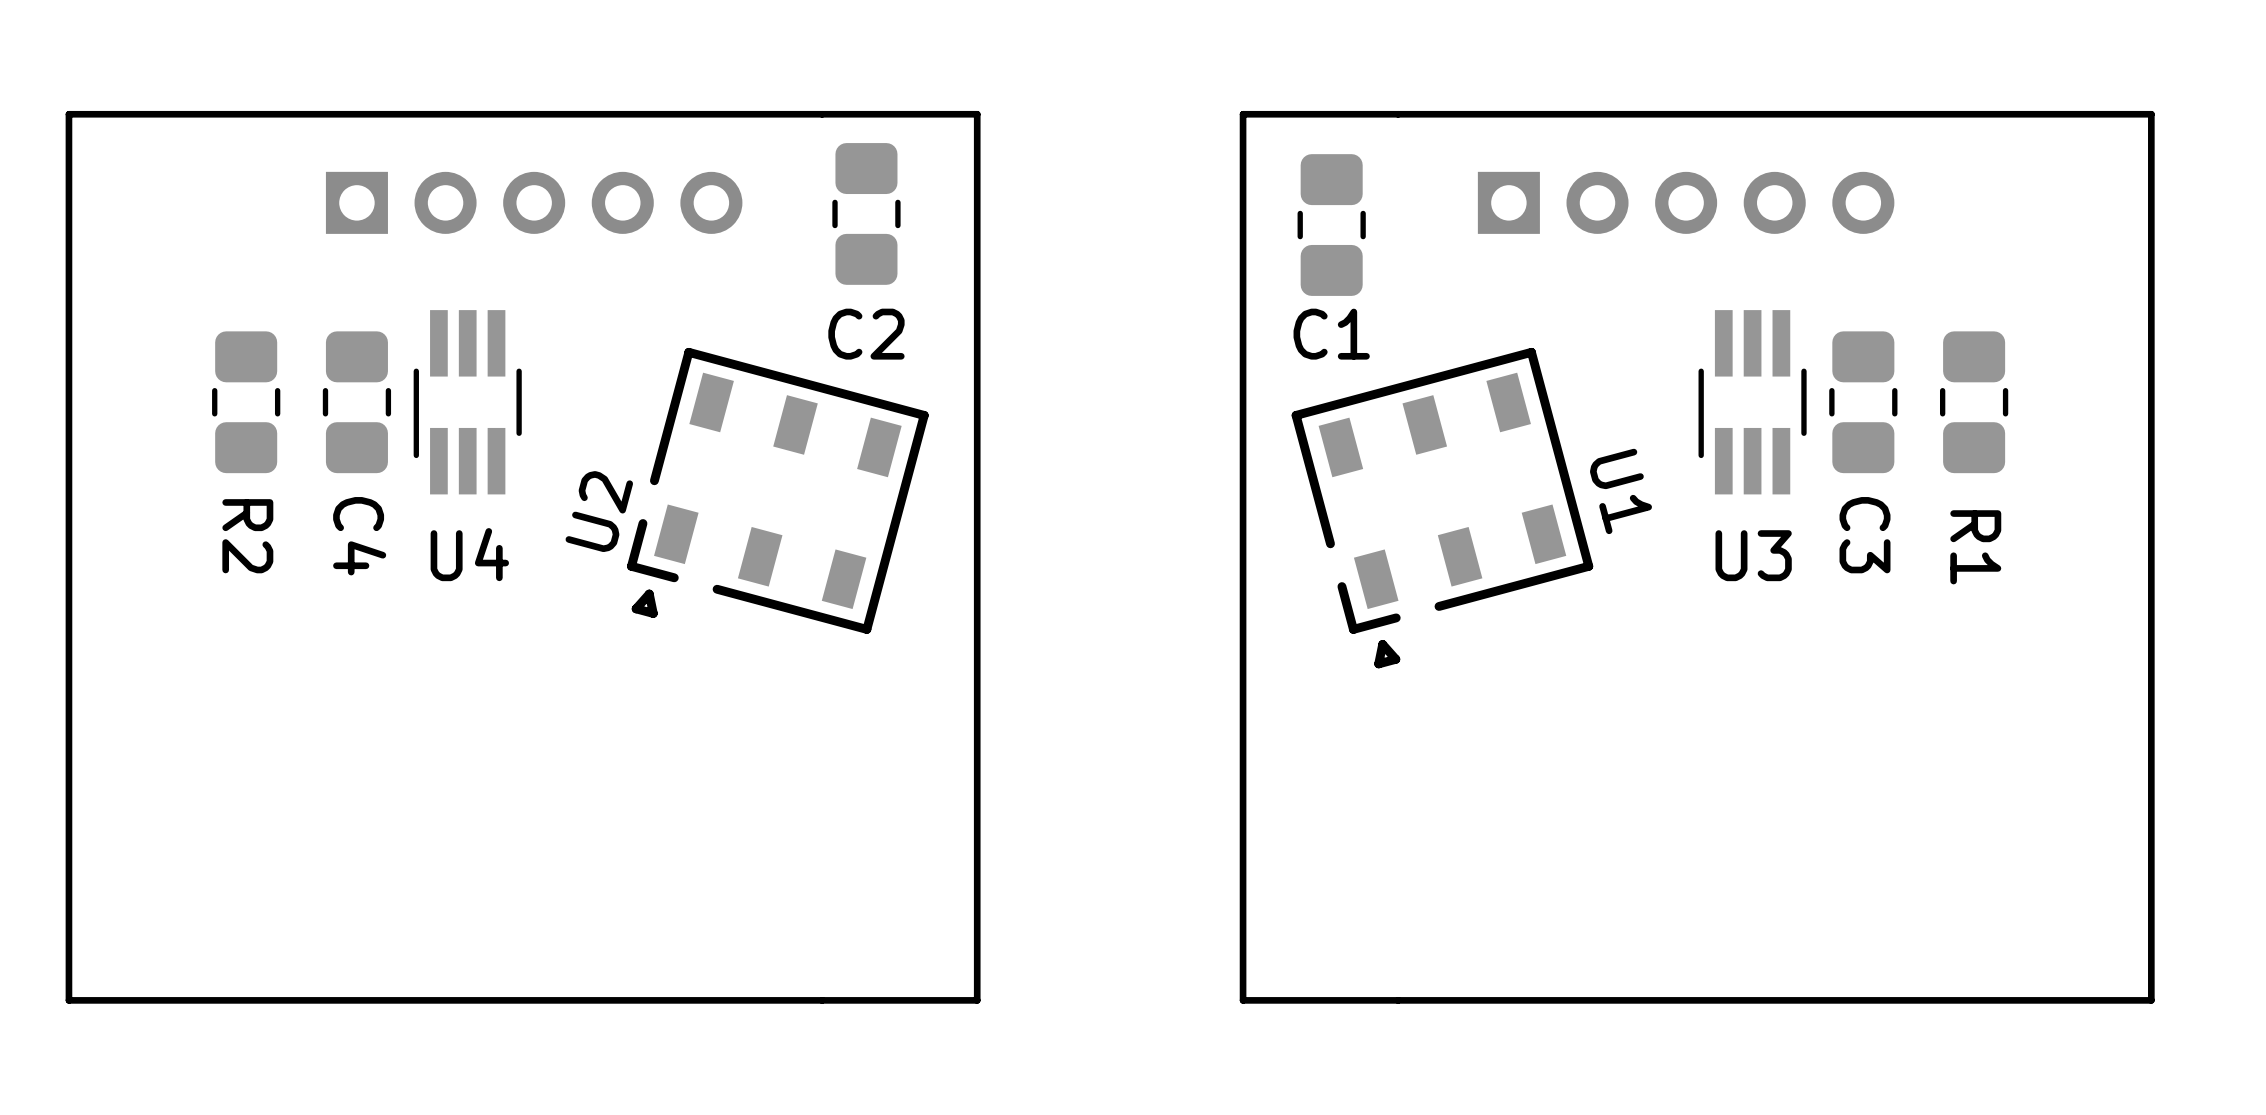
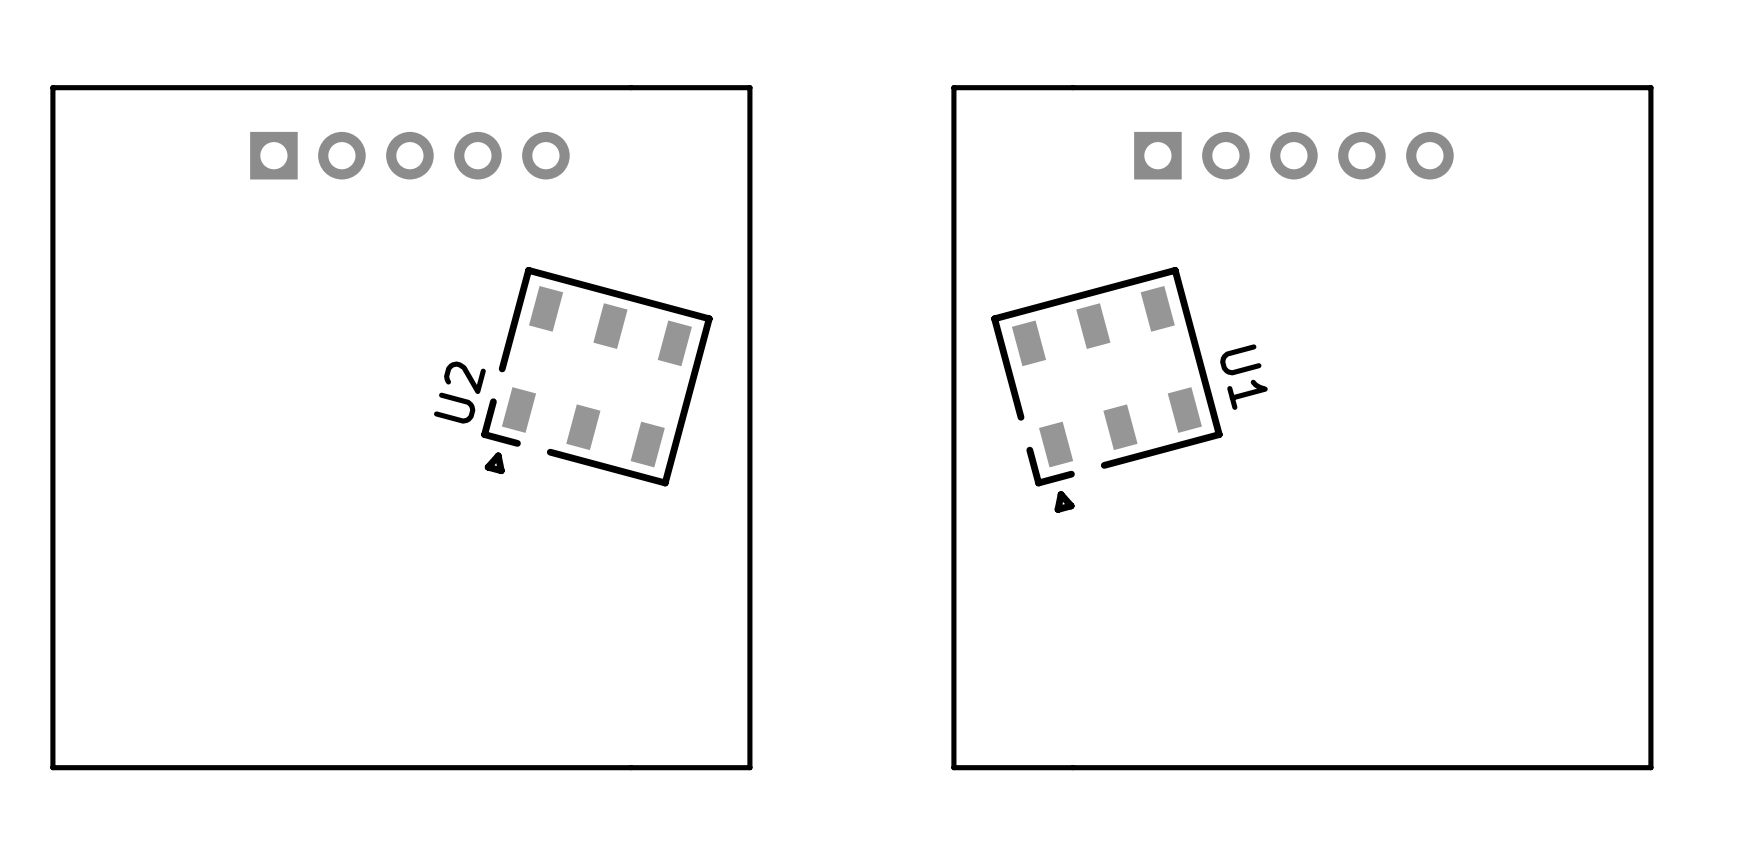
C2: (866, 213) -> none
C1: (1331, 225) -> none
R2: (246, 402) -> none
C4: (356, 402) -> none
U4: (467, 402) -> none
U3: (1752, 402) -> none
C3: (1863, 402) -> none
R1: (1974, 402) -> none

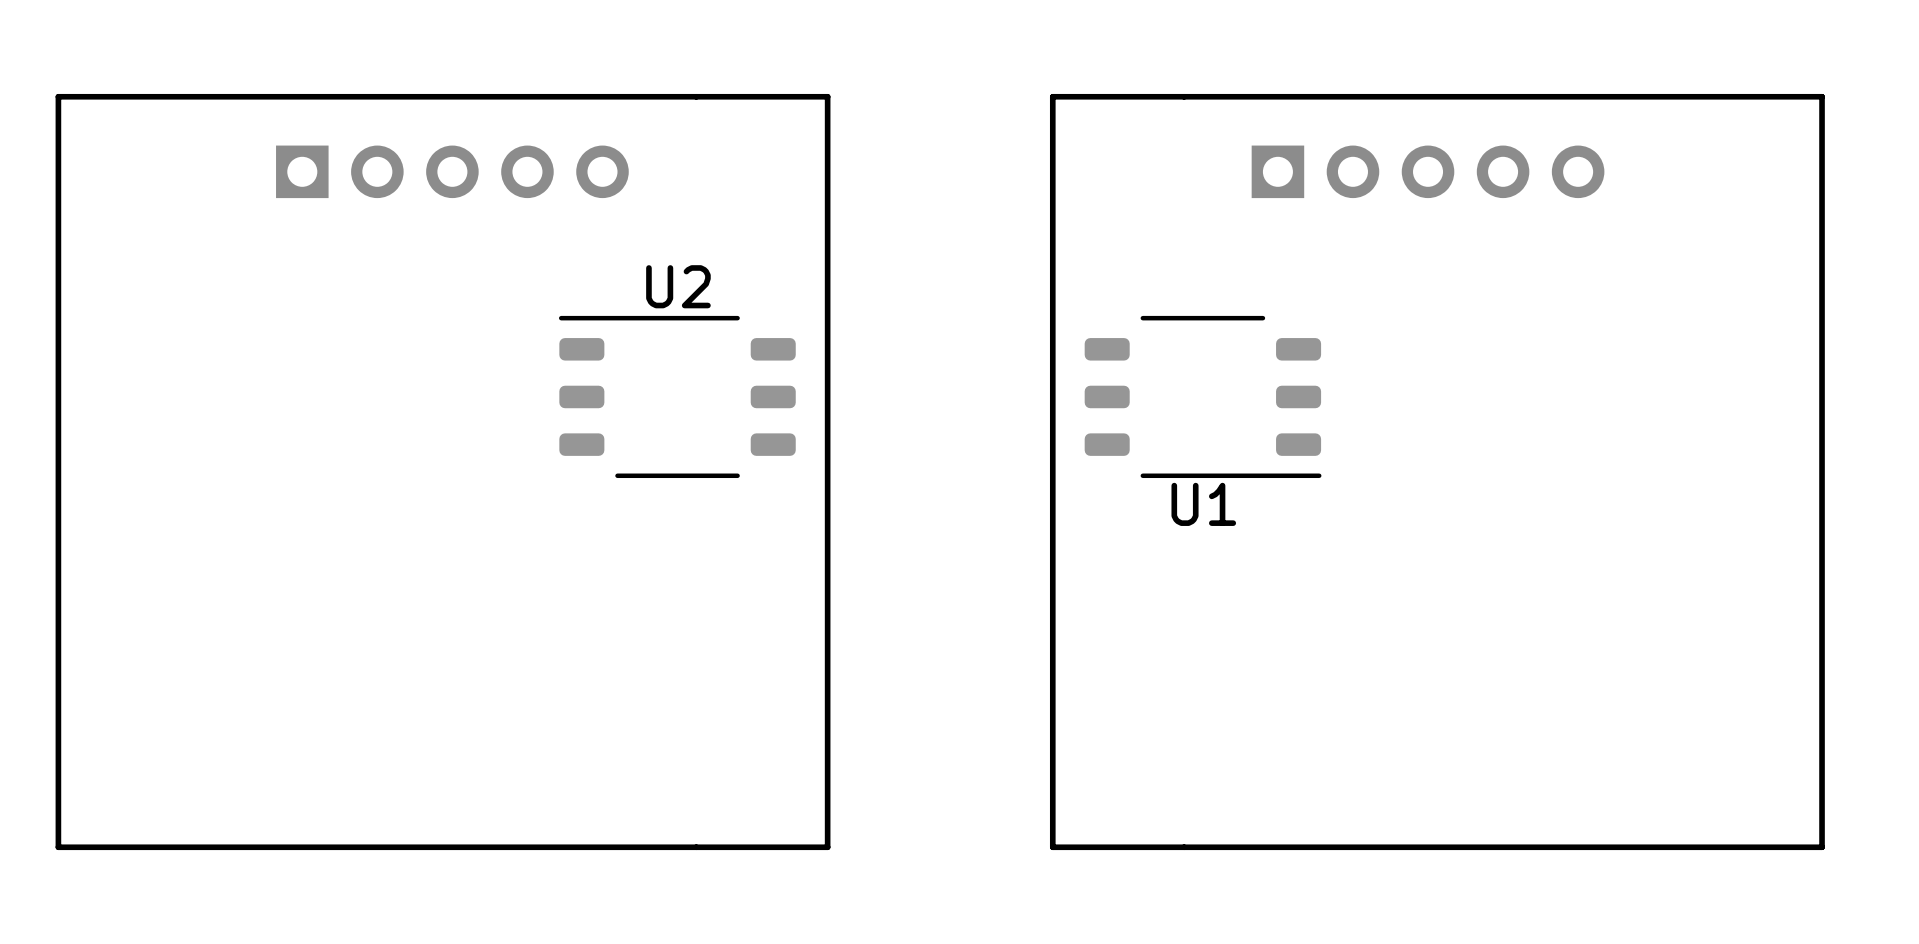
U2 footprint: [481, 266, 713, 487] -> [558, 315, 796, 479]
U1 footprint: [991, 266, 1223, 513] -> [1084, 315, 1322, 479]
U1 name position: U1 (1243, 377) -> U1 (1203, 504)
U2 name position: U2 (459, 392) -> U2 (678, 286)

